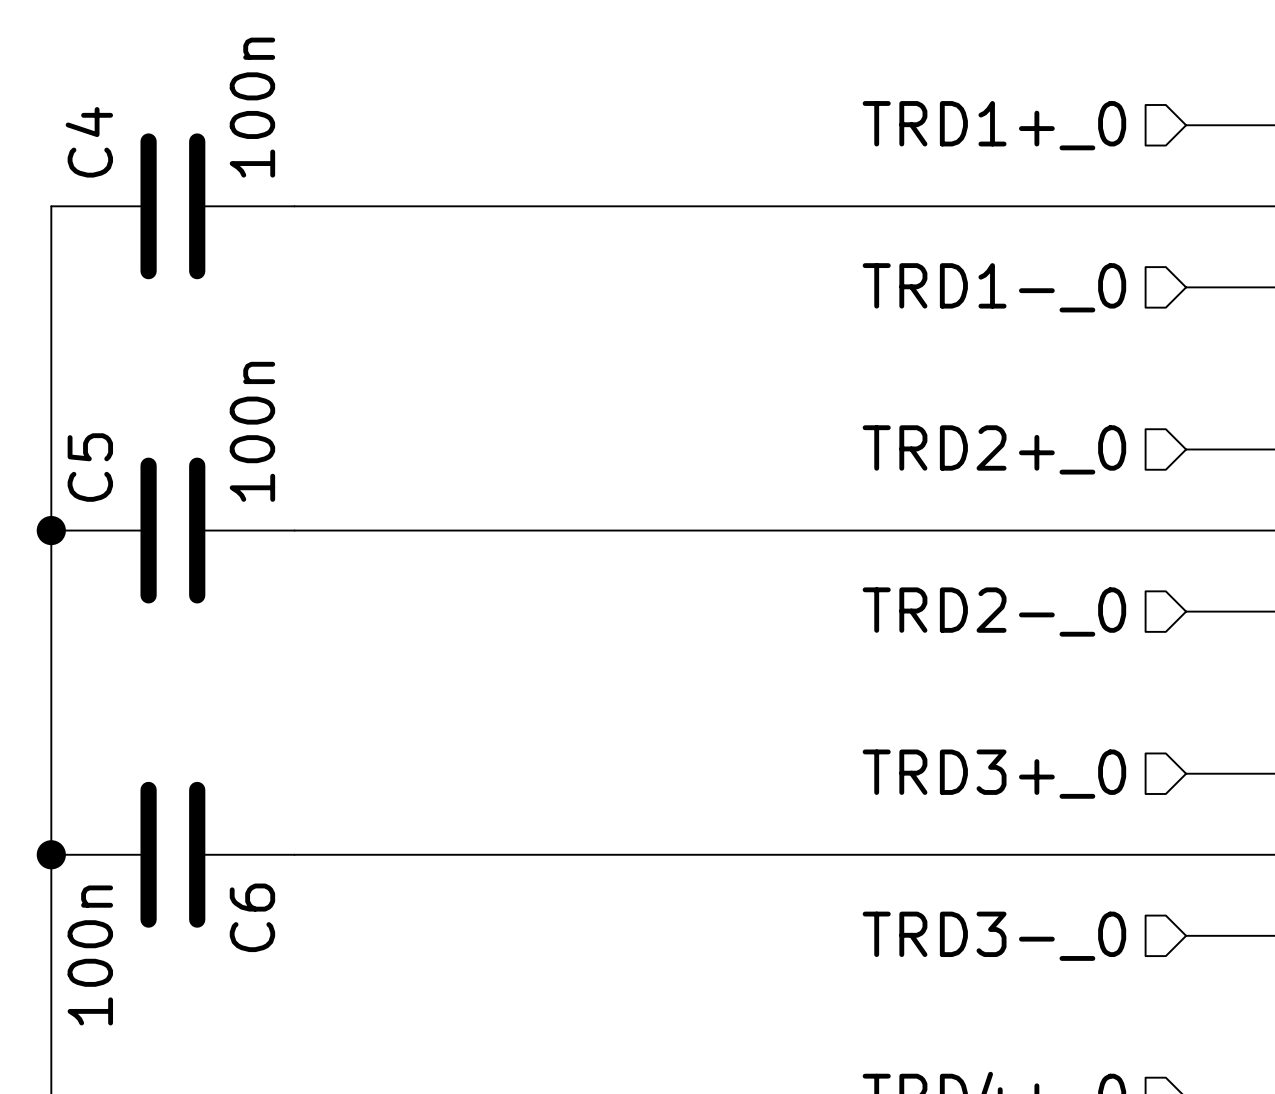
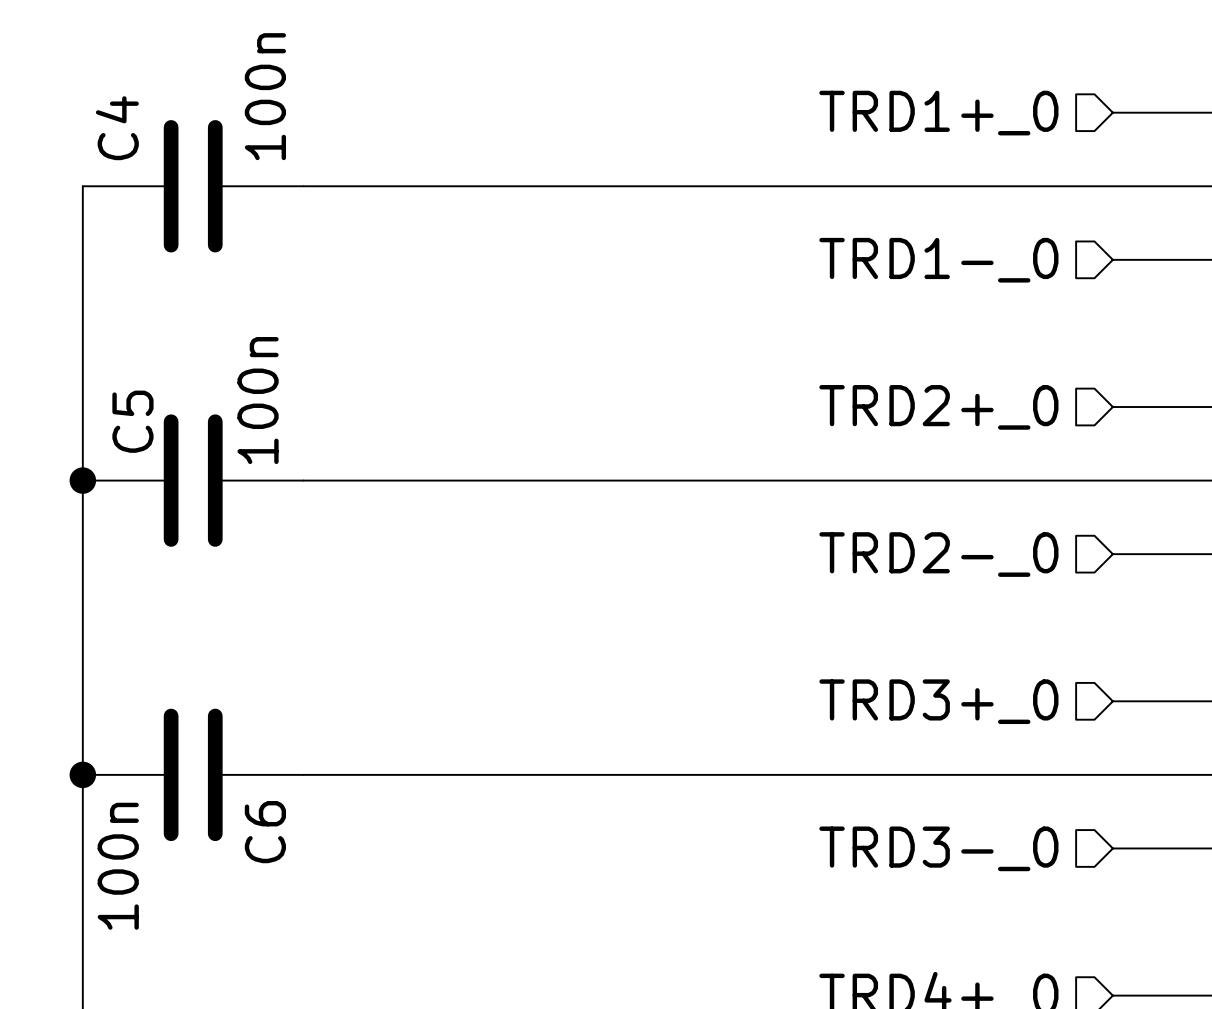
C5 value position: 100n (252, 431) -> 100n (258, 400)
C5 name position: C5 (90, 467) -> C5 (132, 421)

